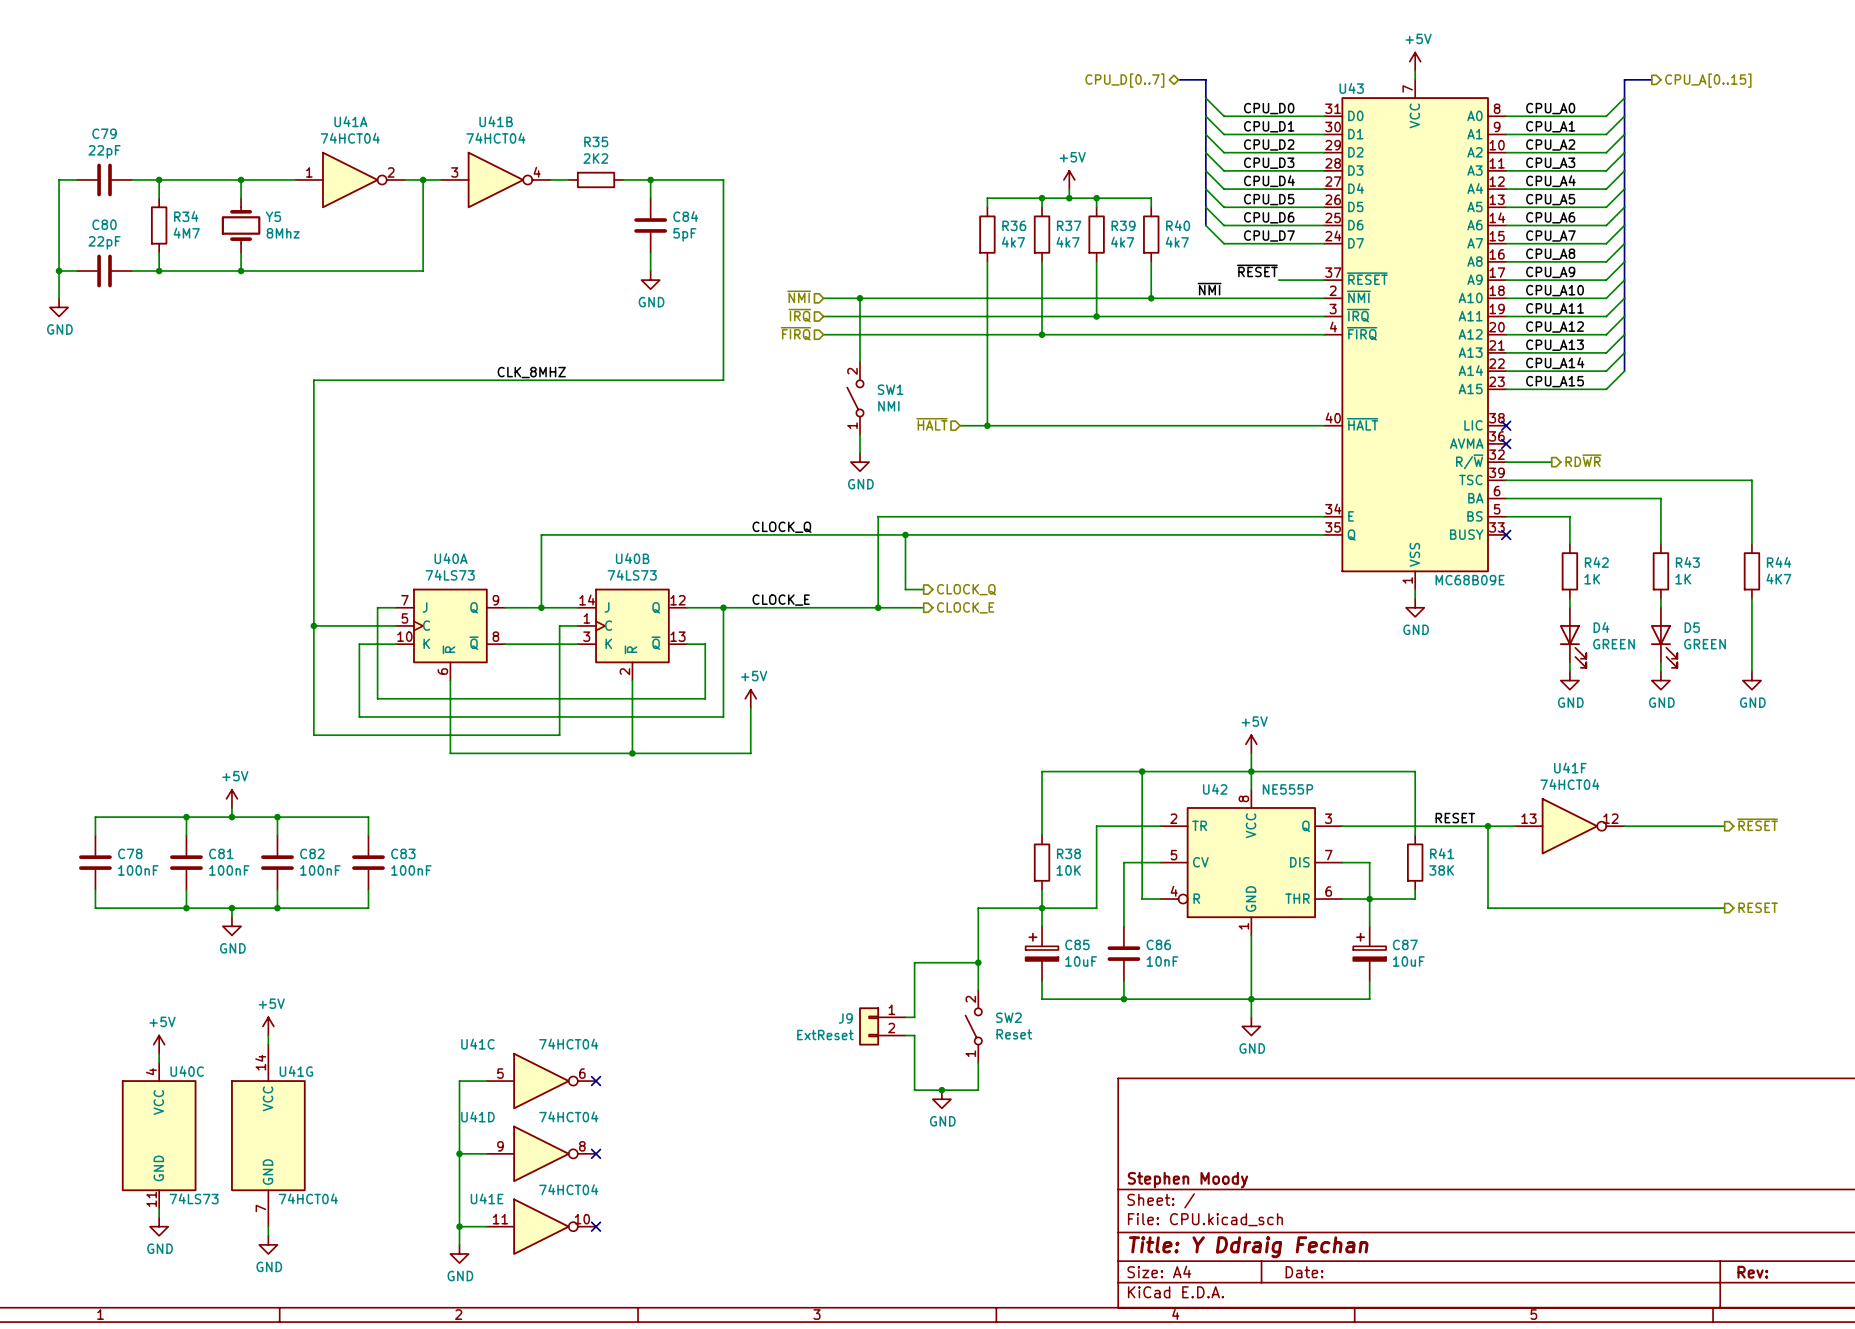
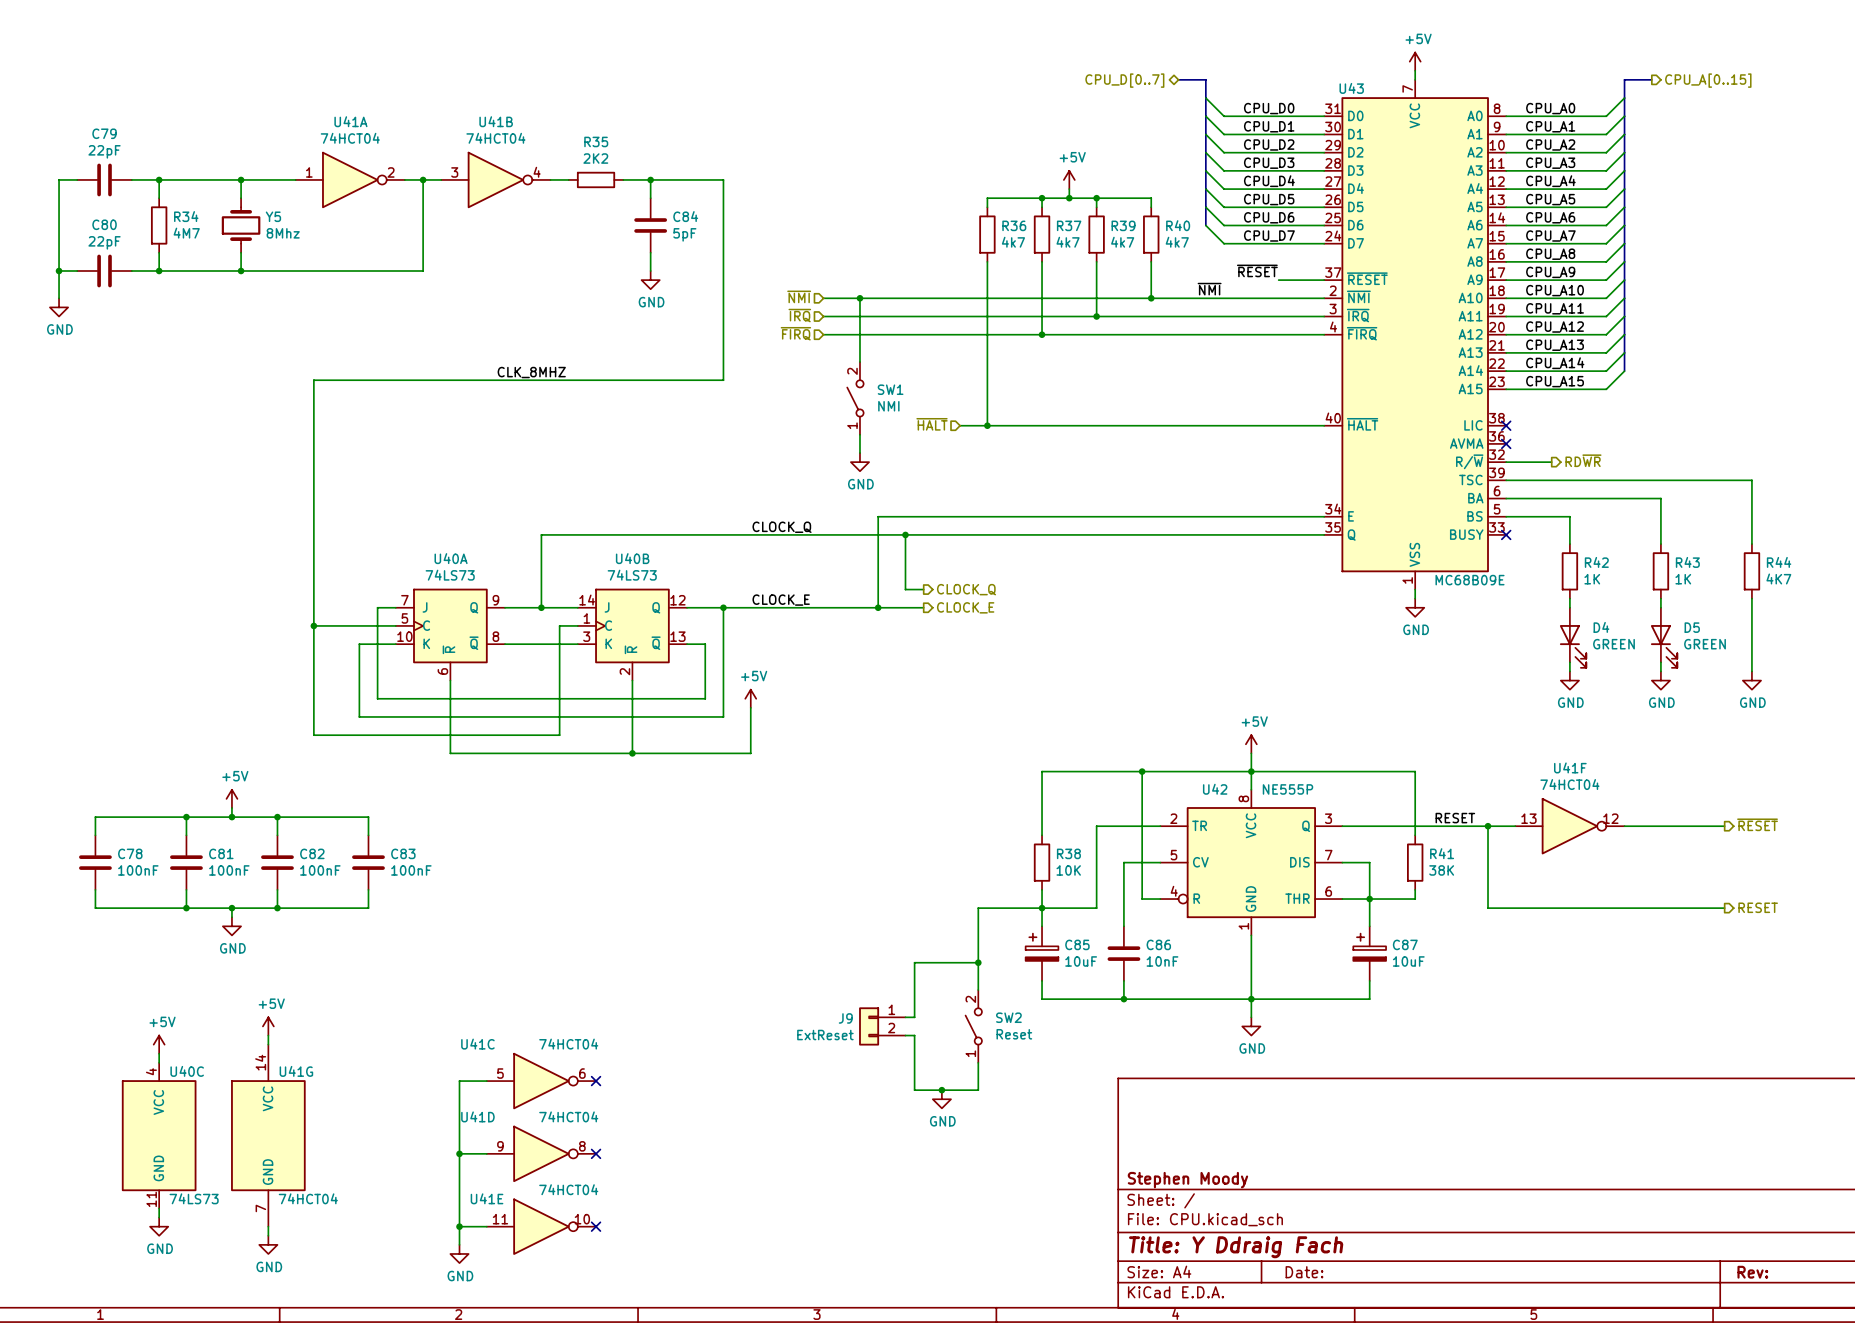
title block: Title: Y Ddraig Fechan (1248, 1247) -> Title: Y Ddraig Fach (1236, 1247)

